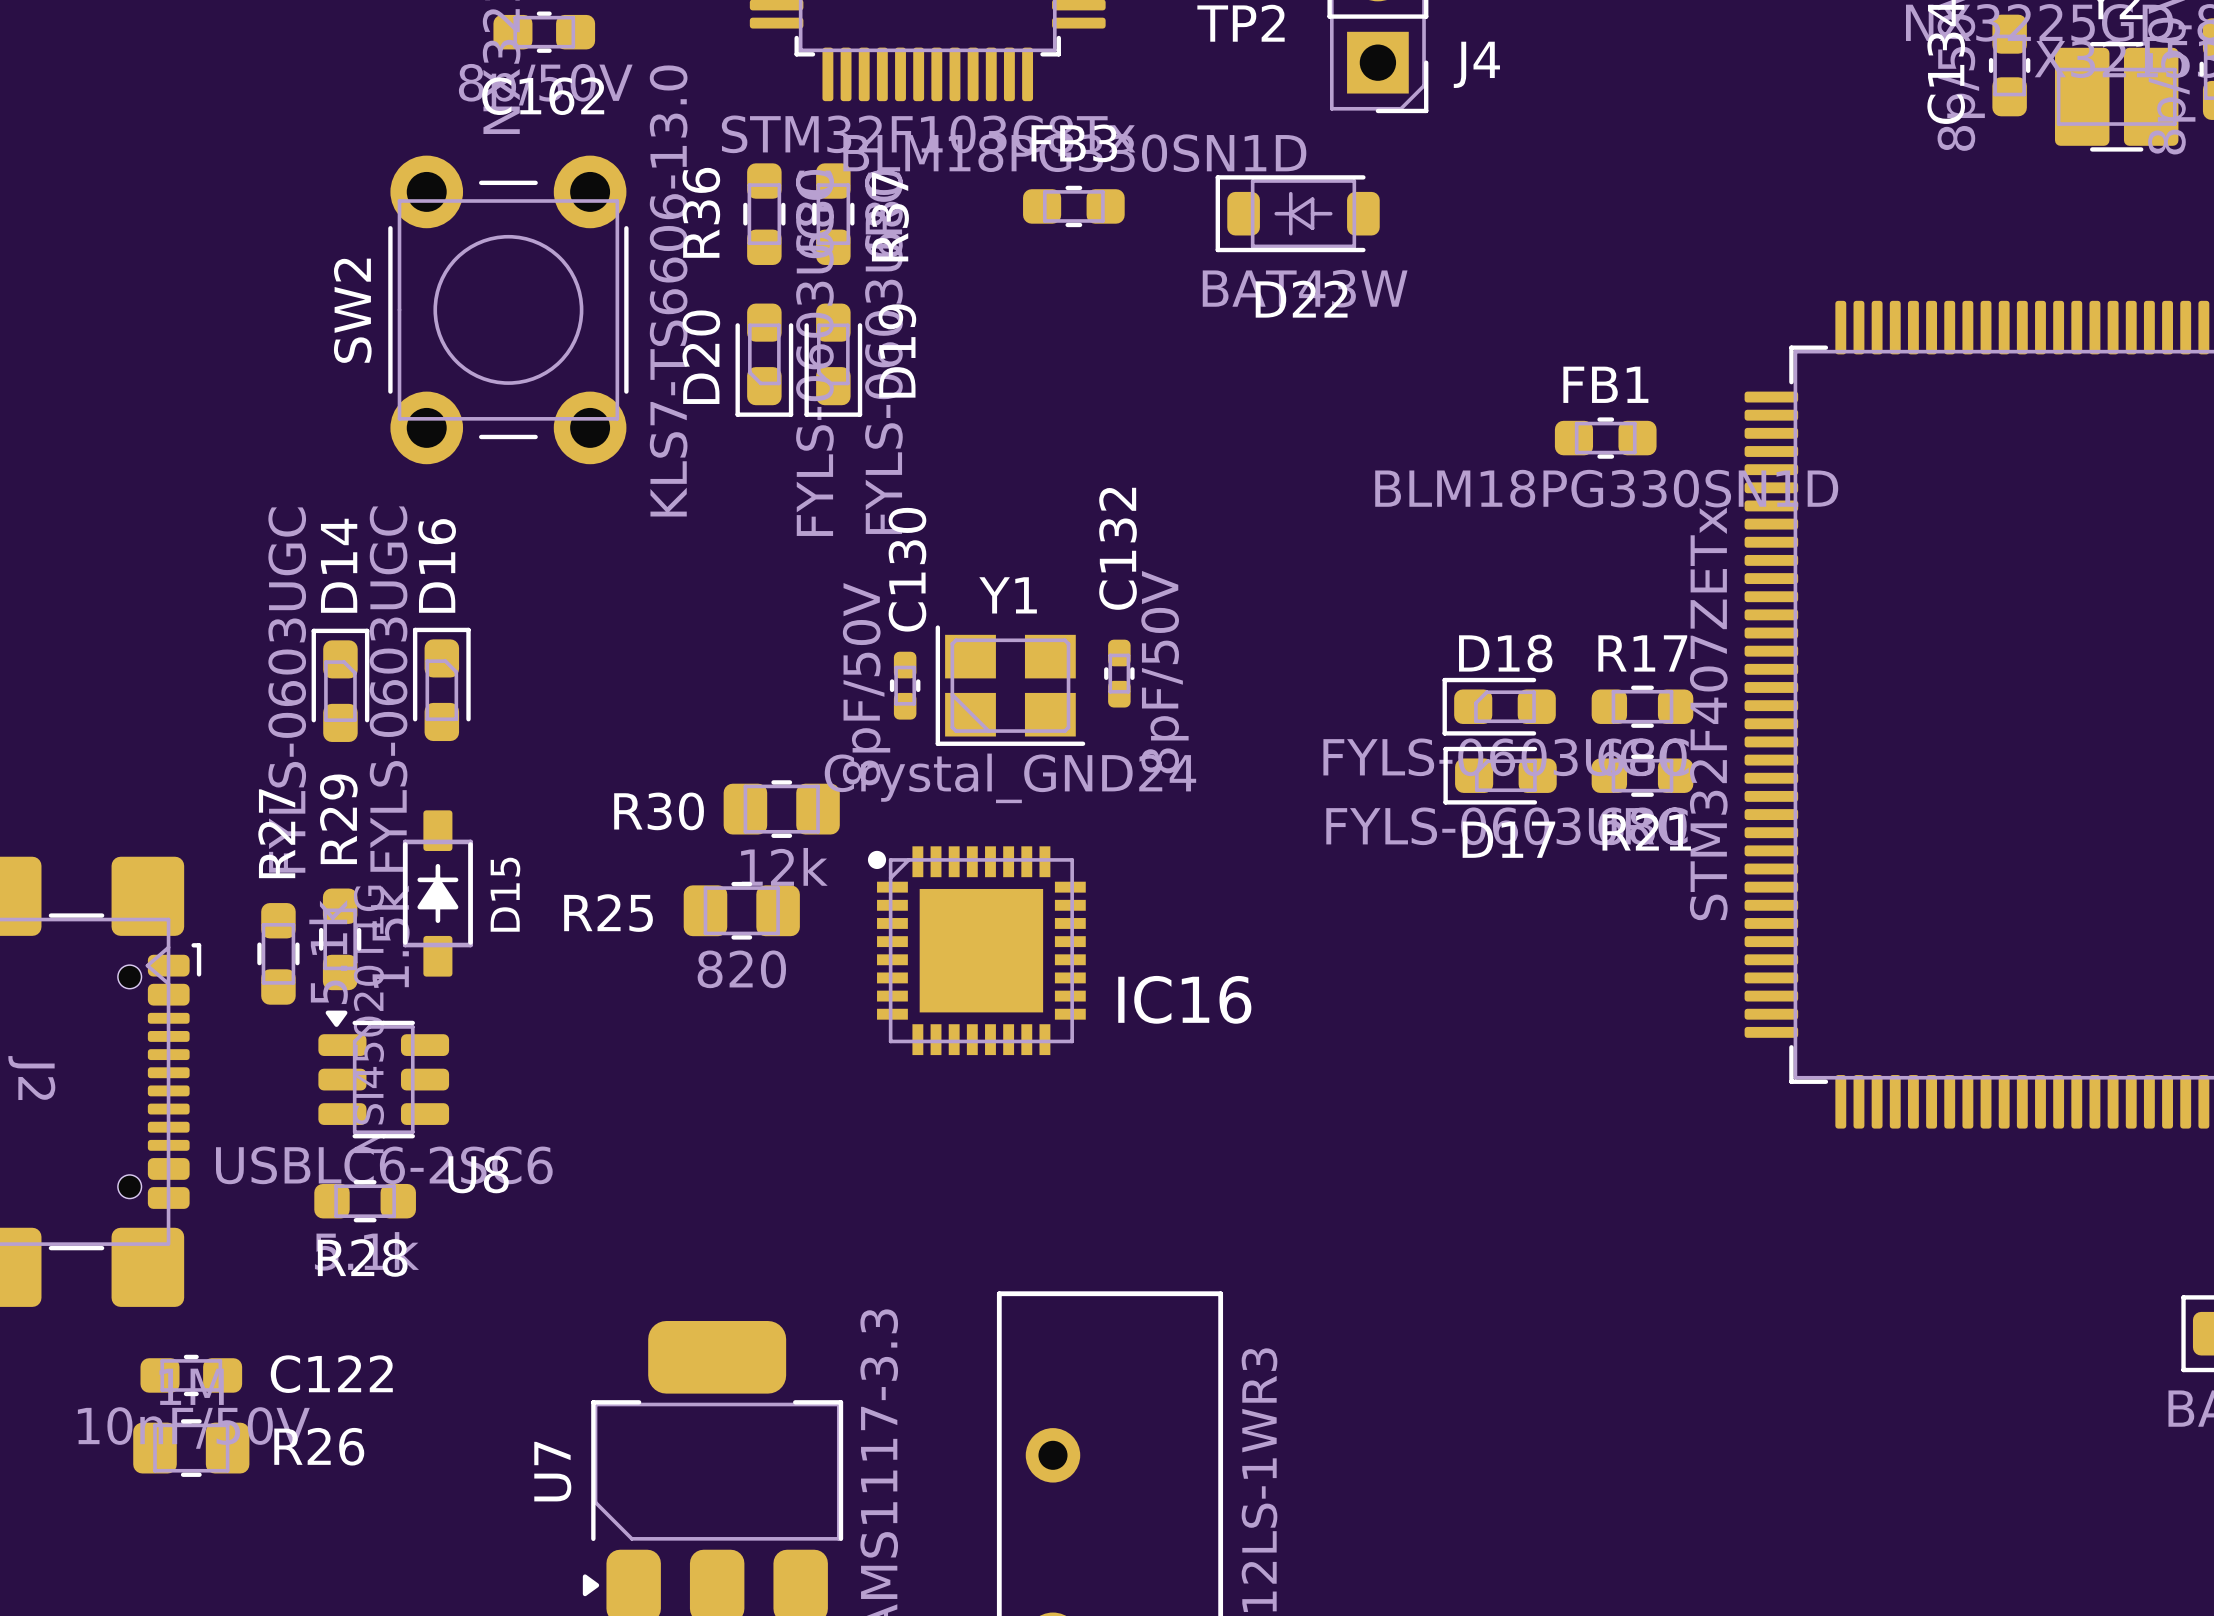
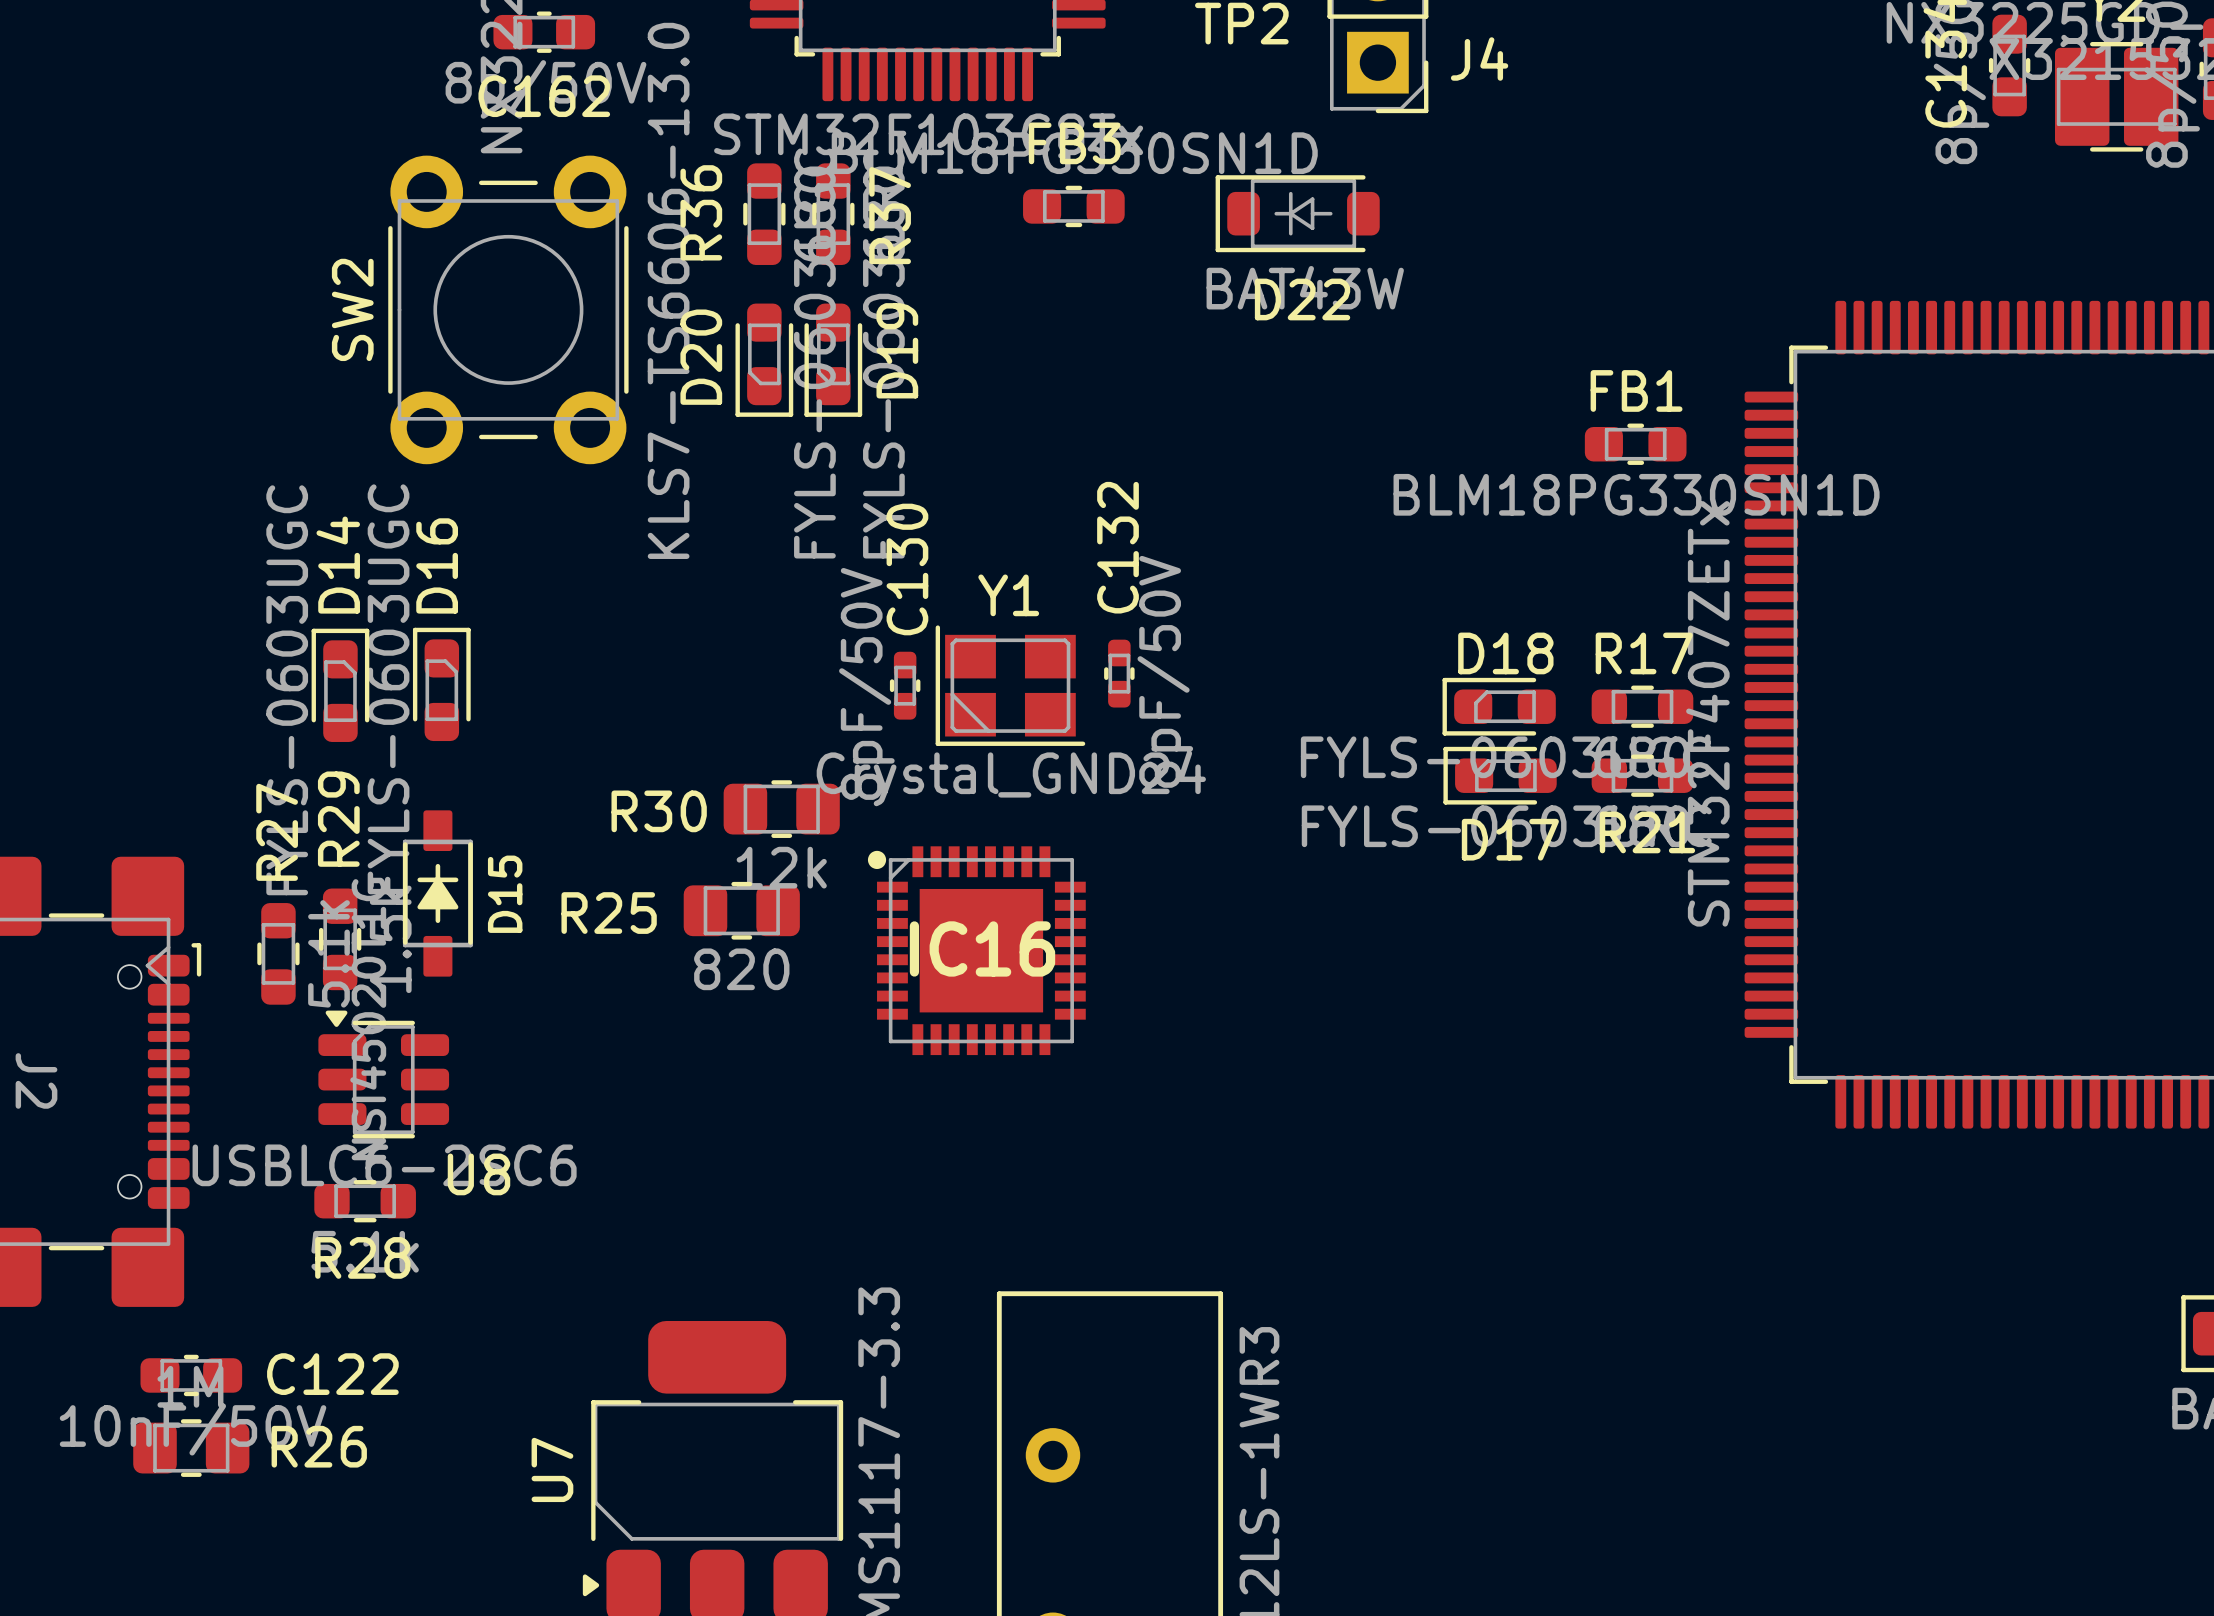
FB1 position: (1605, 438) -> (1635, 444)
IC16 name position: IC16 (1184, 999) -> IC16 (982, 948)

